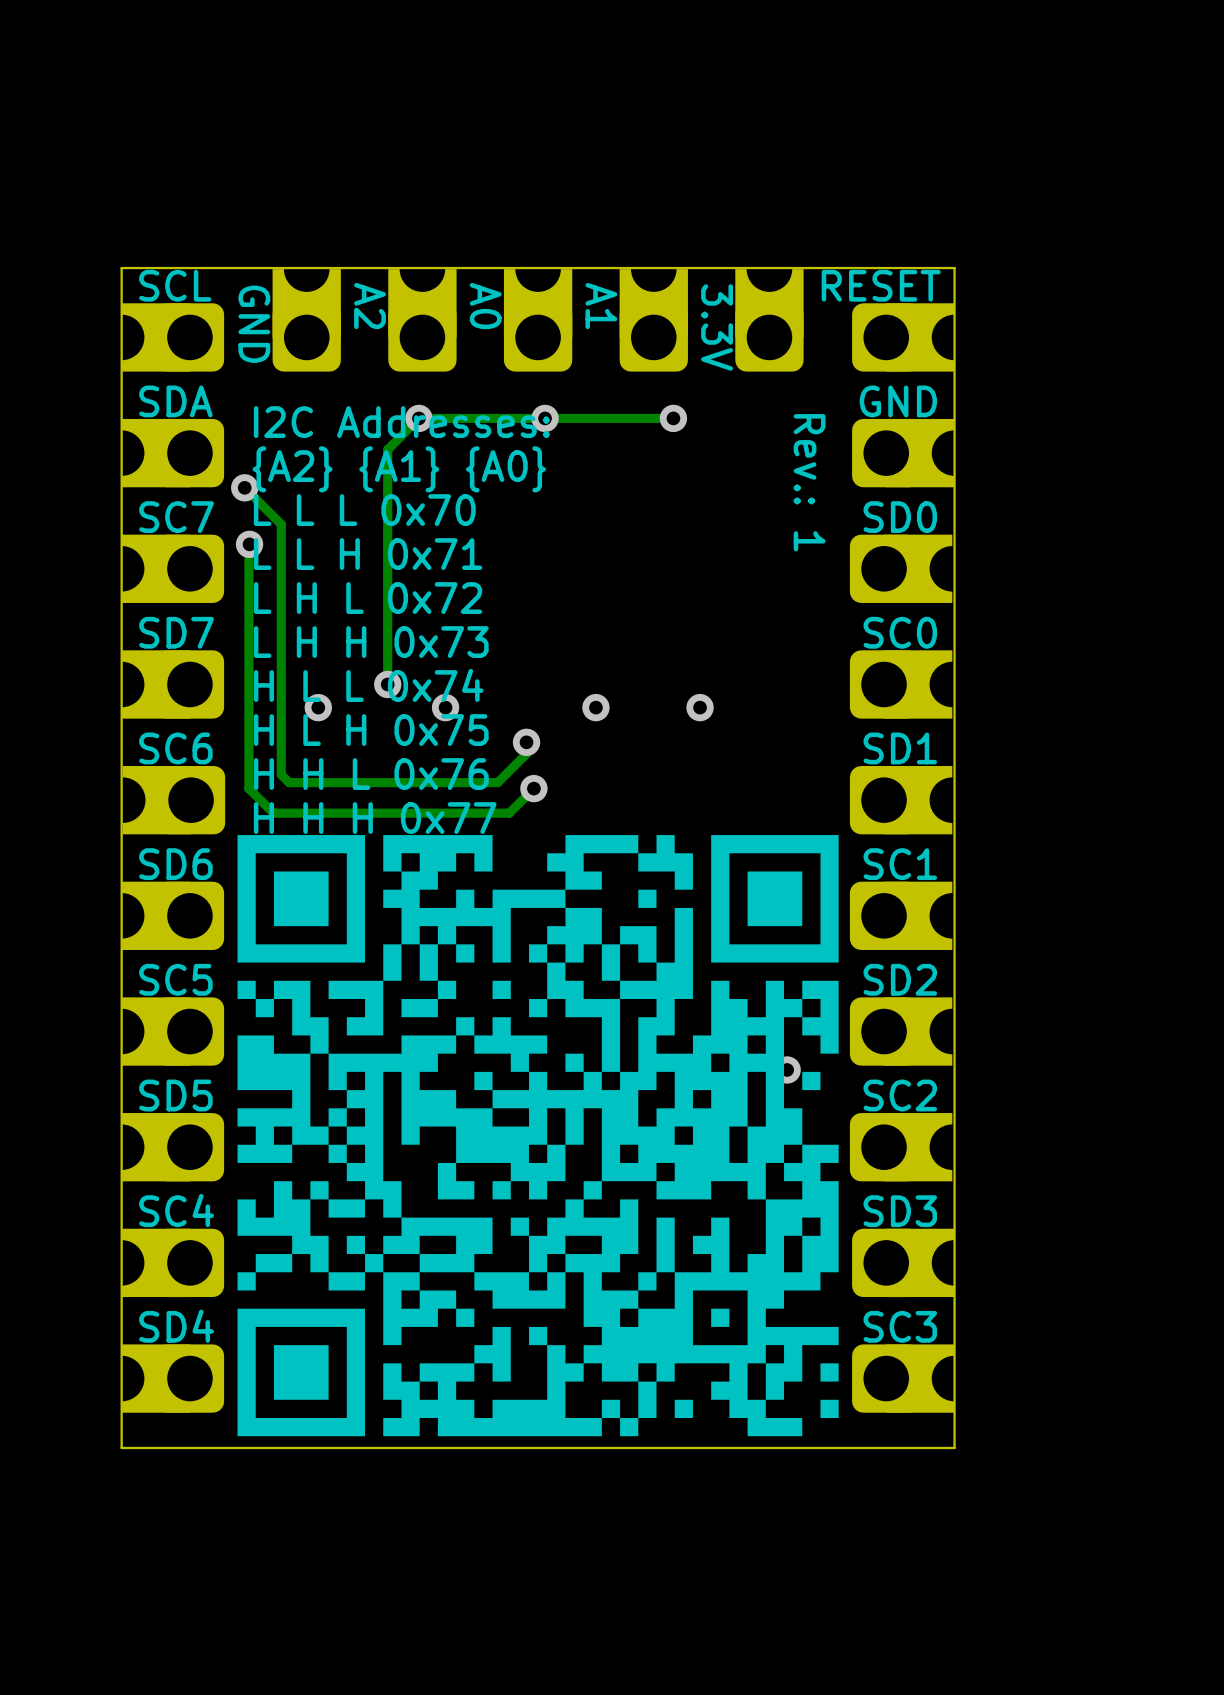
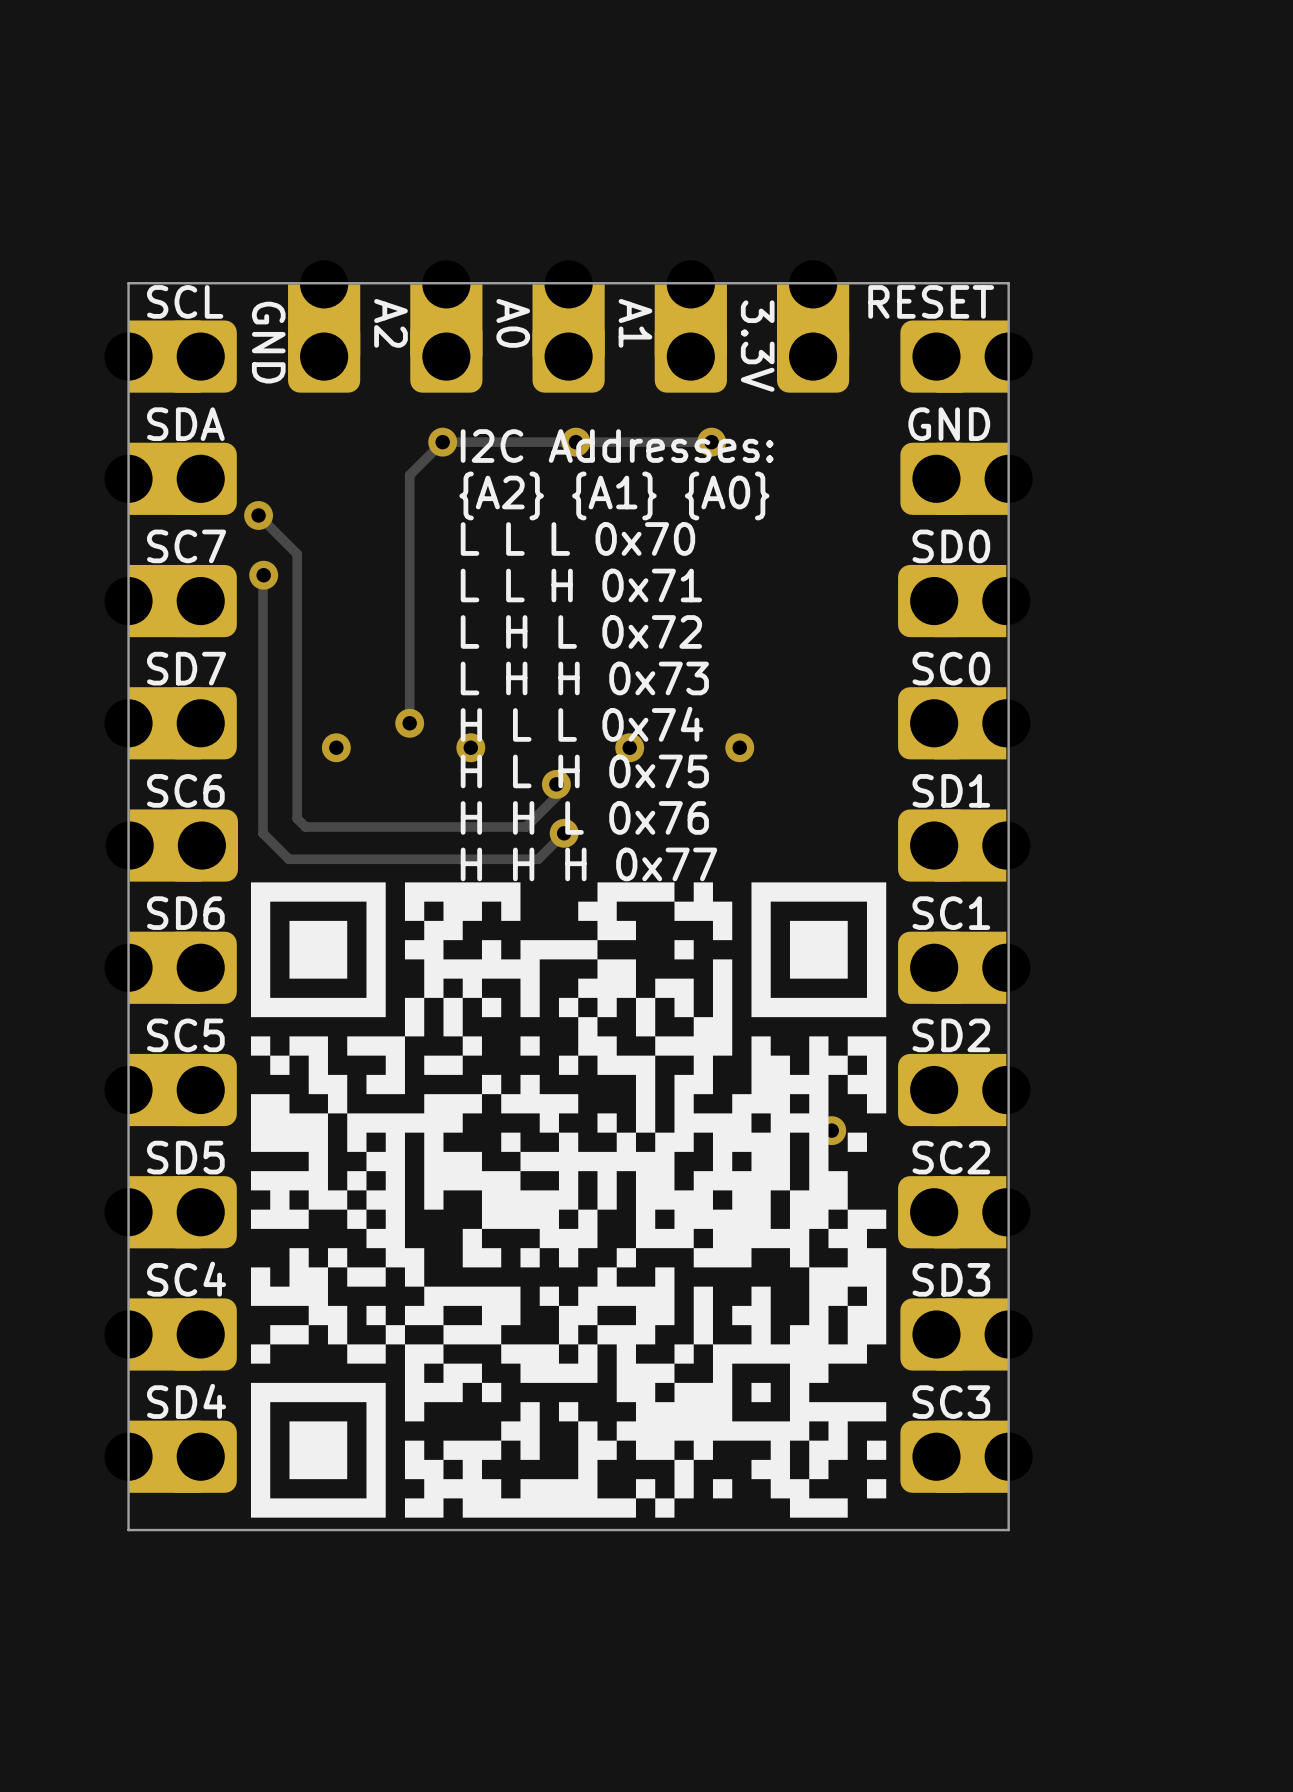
text position: I2C Addresses: (401, 422) -> I2C Addresses: (617, 446)
text position: {A2} {A1} {A0} (399, 469) -> {A2} {A1} {A0} (614, 495)
text: Rev.: 1 (809, 482) -> none
text position: L L L 0x70 (364, 510) -> L L L 0x70 (577, 538)
text position: L L H 0x71 (368, 554) -> L L H 0x71 (581, 585)
text position: L H L 0x72 (368, 598) -> L H L 0x72 (581, 631)
text position: L H H 0x73 (371, 642) -> L H H 0x73 (584, 678)
text position: H L L 0x74 (368, 685) -> H L L 0x74 (582, 724)
text position: H L H 0x75 (371, 730) -> H L H 0x75 (584, 771)
text position: H H L 0x76 (371, 774) -> H H L 0x76 (584, 817)
text position: H H H 0x77 (375, 818) -> H H H 0x77 (588, 864)

